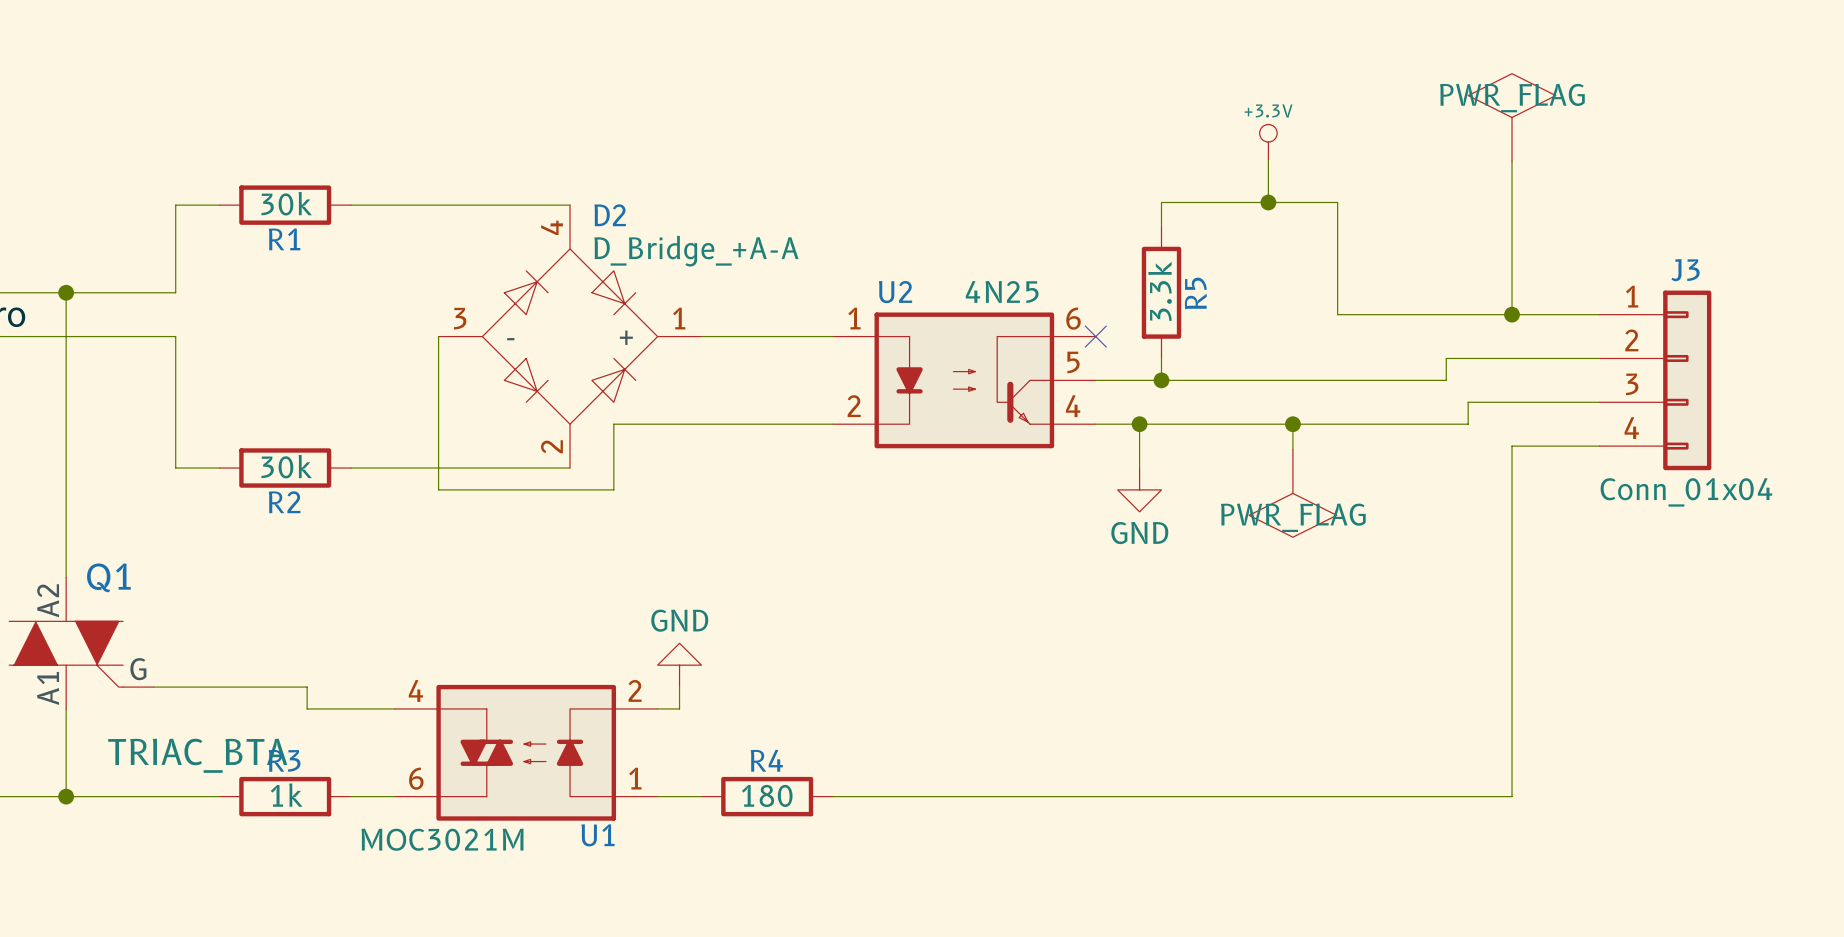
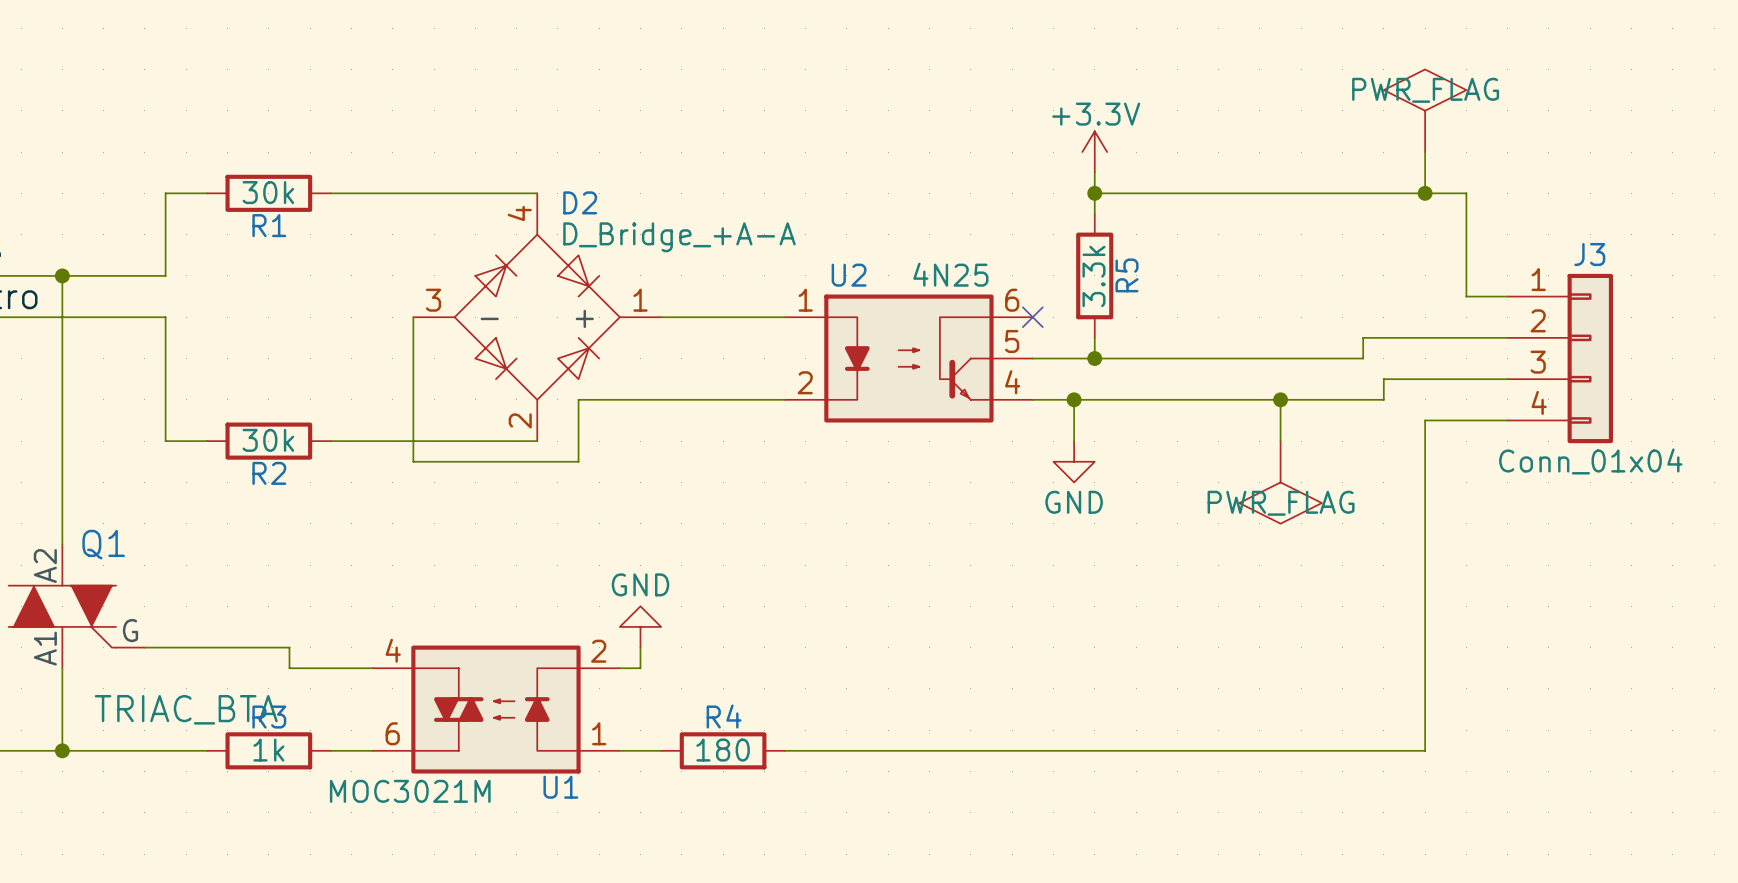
power symbol: +3.3V (1268, 142) -> none
wire: (1268, 159) (1268, 202) -> none
power symbol: none -> +3.3V (1094, 152)
wire: none -> (1094, 172) (1094, 190)
wire: (1161, 202) (1337, 202) (1337, 314) (1555, 314) -> (1094, 193) (1466, 193) (1466, 296)
junction: (1268, 202) -> none
junction: none -> (1094, 193)
wire: (1512, 205) (1512, 314) -> none
junction: none -> (1425, 193)
junction: (1512, 314) -> none
wire: (1292, 424) (1292, 449) -> none
junction position: (1292, 424) -> (1280, 399)
wire: none -> (1280, 399) (1280, 441)
power symbol position: PWR_FLAG (1292, 493) -> PWR_FLAG (1280, 482)

